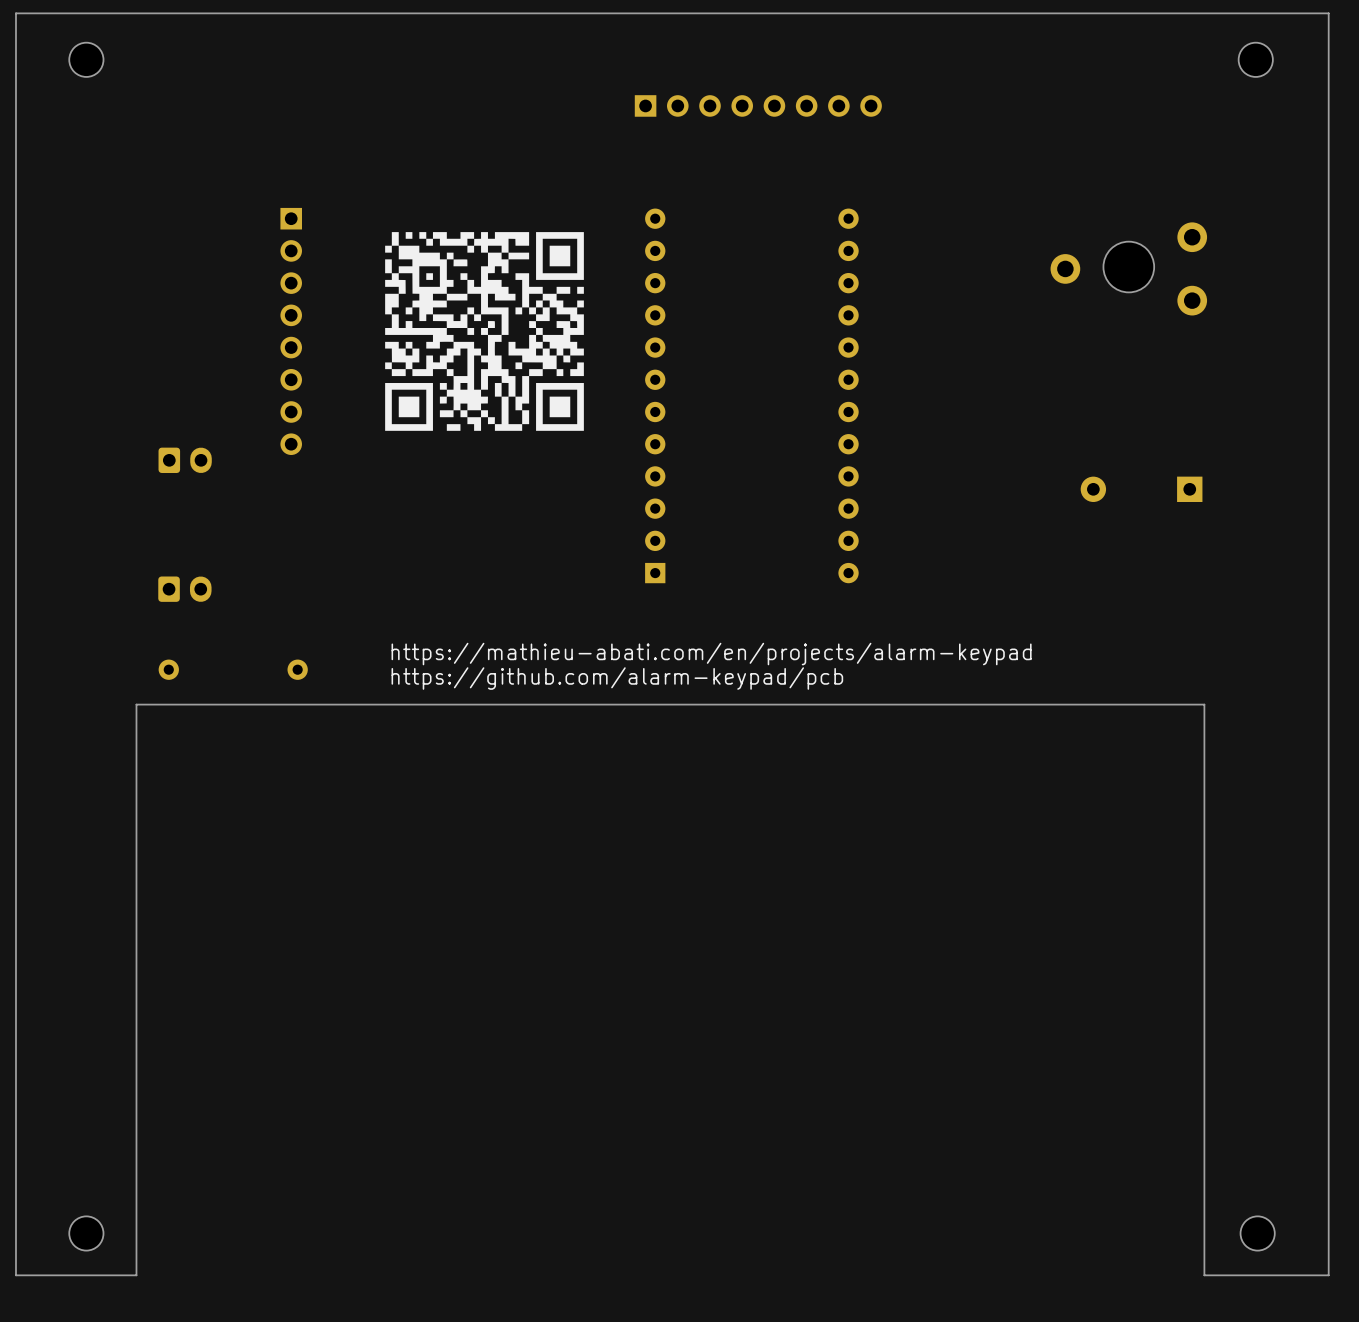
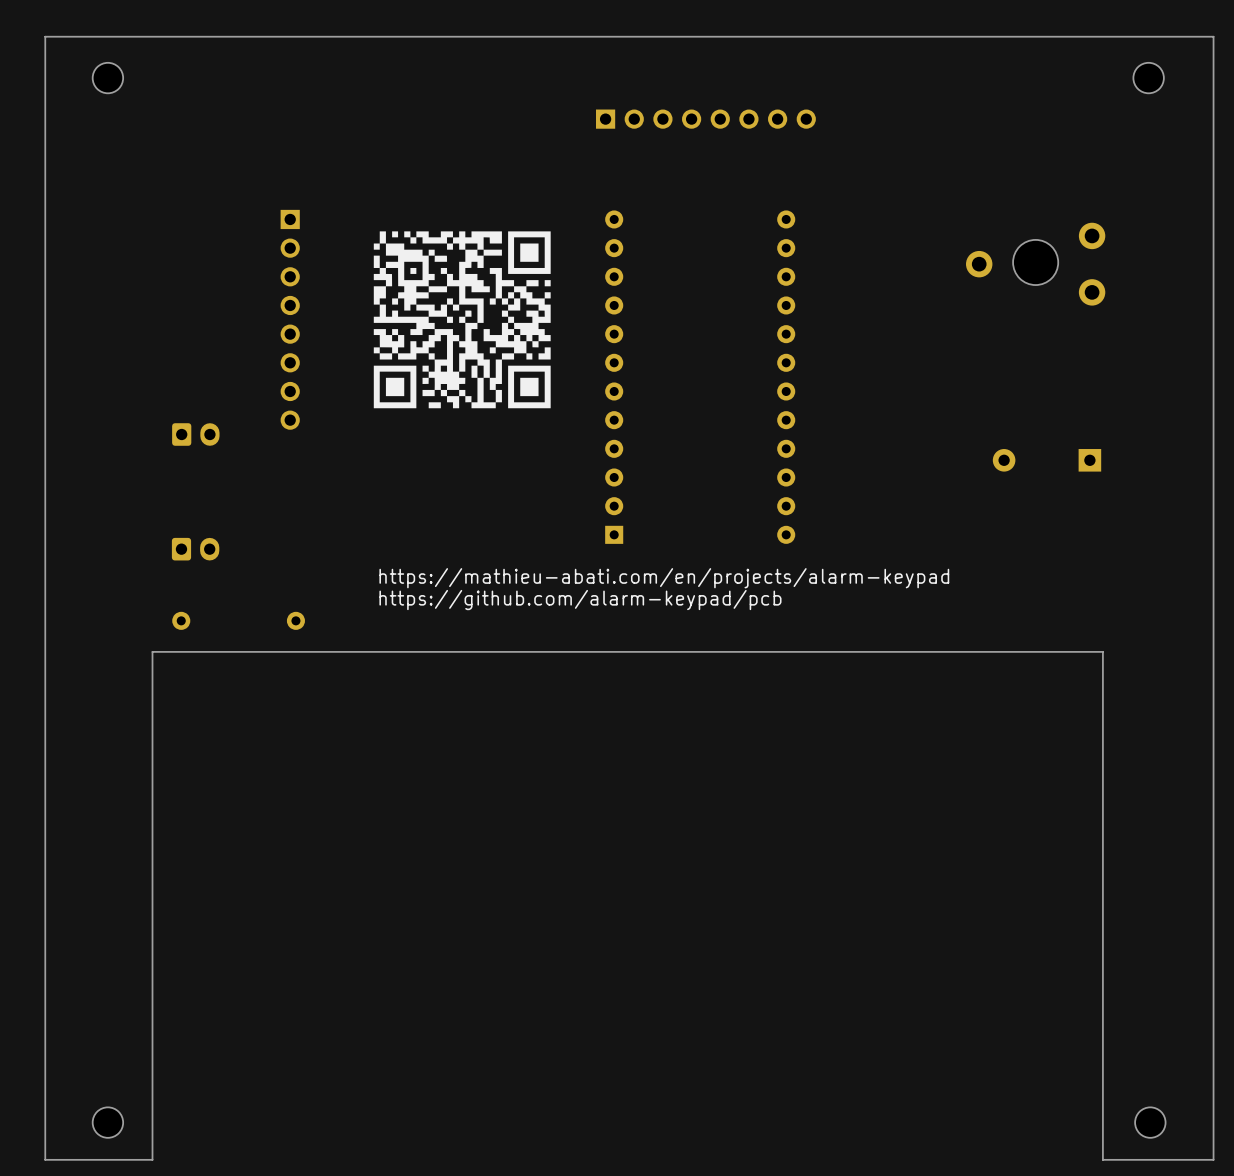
text: none -> https://mathieu-abati.com/en/projects/alarm-keypad (664, 578)
text: https://mathieu-abati.com/en/projects/alarm-keypad (711, 654) -> https://github.com/alarm-keypad/pcb (580, 600)
text: https://github.com/alarm-keypad/pcb (617, 678) -> none

